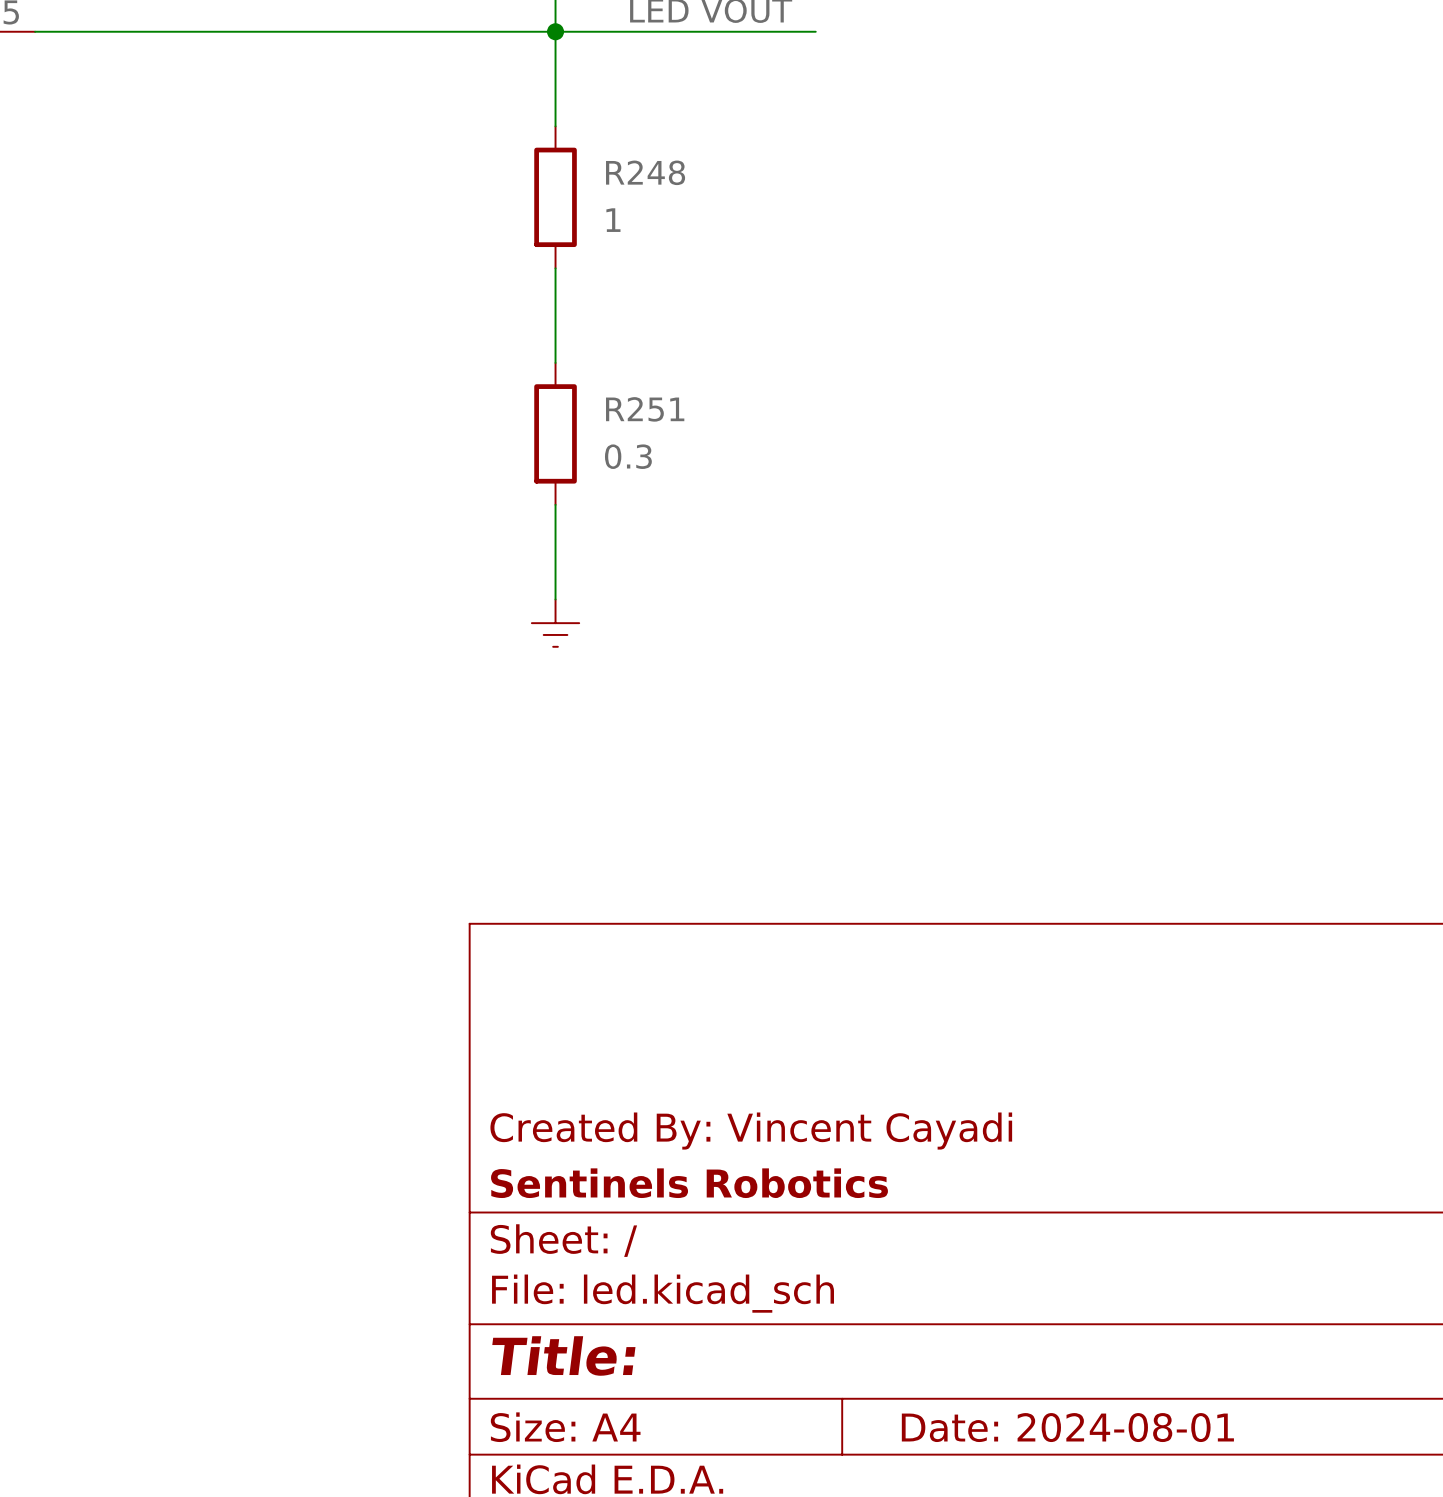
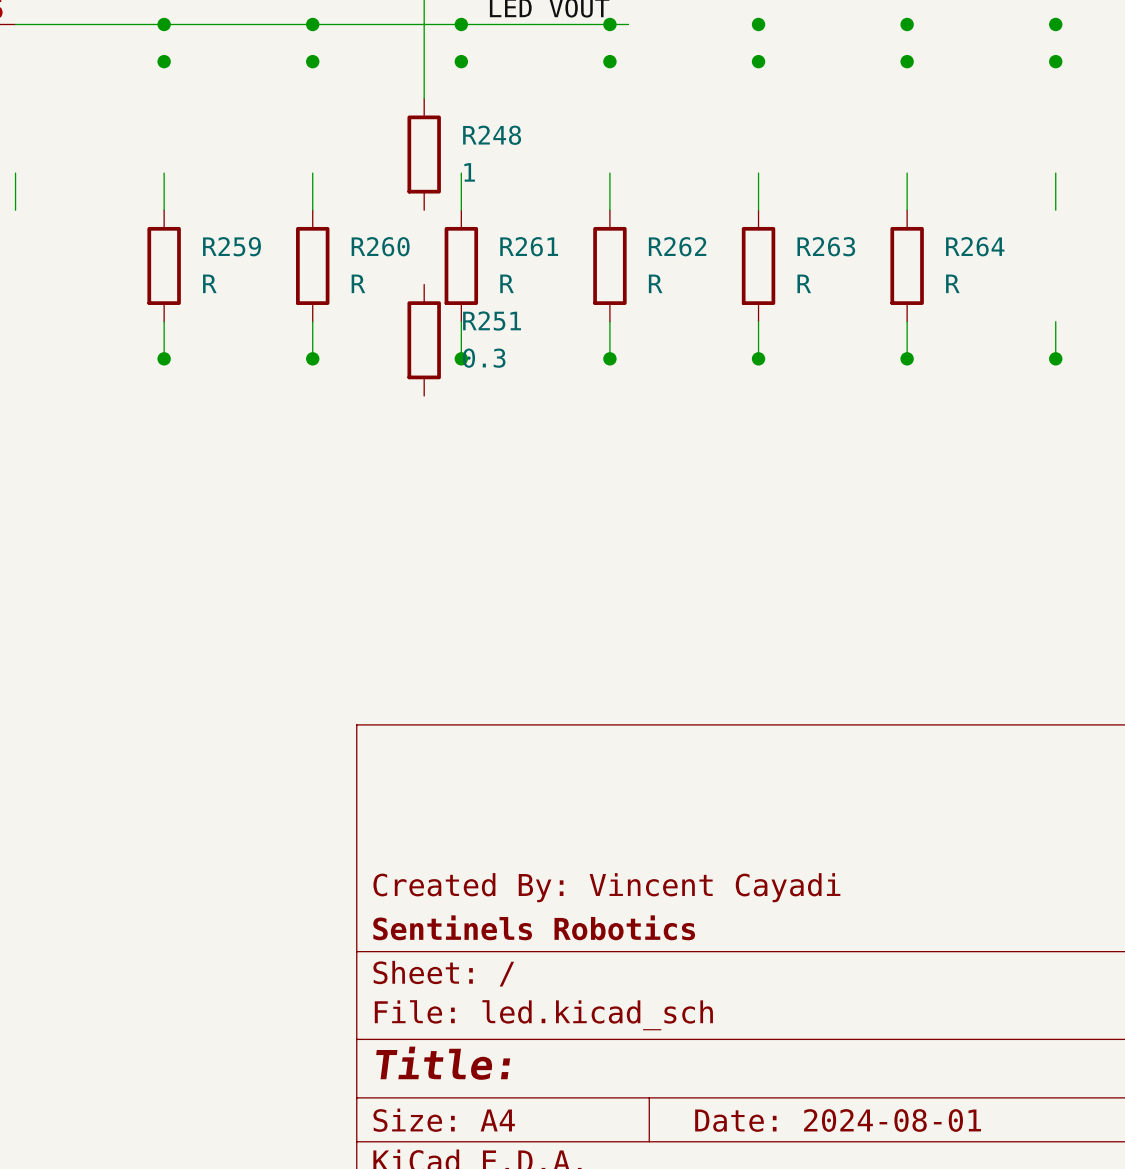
junction: none -> (164, 24)
junction: none -> (312, 24)
junction: (555, 31) -> none
junction: none -> (461, 24)
junction: none -> (609, 24)
junction: none -> (758, 24)
junction: none -> (907, 24)
junction: none -> (1055, 24)
junction: none -> (164, 61)
junction: none -> (312, 61)
junction: none -> (461, 61)
junction: none -> (609, 61)
junction: none -> (758, 61)
junction: none -> (907, 61)
junction: none -> (1055, 61)
wire: none -> (15, 173) (15, 210)
wire: none -> (164, 173) (164, 210)
wire: none -> (312, 173) (312, 210)
wire: none -> (461, 173) (461, 210)
wire: none -> (609, 173) (609, 210)
wire: none -> (758, 173) (758, 210)
wire: none -> (907, 173) (907, 210)
wire: none -> (1055, 173) (1055, 210)
wire: (555, 268) (555, 362) -> none
R259: none -> R (164, 265)
R260: none -> R (312, 265)
R261: none -> R (461, 265)
R262: none -> R (609, 265)
R263: none -> R (758, 265)
R264: none -> R (907, 265)
wire: none -> (164, 321) (164, 358)
wire: none -> (312, 321) (312, 358)
wire: none -> (461, 321) (461, 358)
wire: none -> (609, 321) (609, 358)
wire: none -> (758, 321) (758, 358)
wire: none -> (907, 321) (907, 358)
wire: none -> (1055, 321) (1055, 358)
junction: none -> (164, 358)
junction: none -> (312, 358)
junction: none -> (461, 358)
junction: none -> (609, 358)
junction: none -> (758, 358)
junction: none -> (907, 358)
junction: none -> (1055, 358)
wire: (555, 504) (555, 599) -> none
power symbol: (555, 623) -> none

